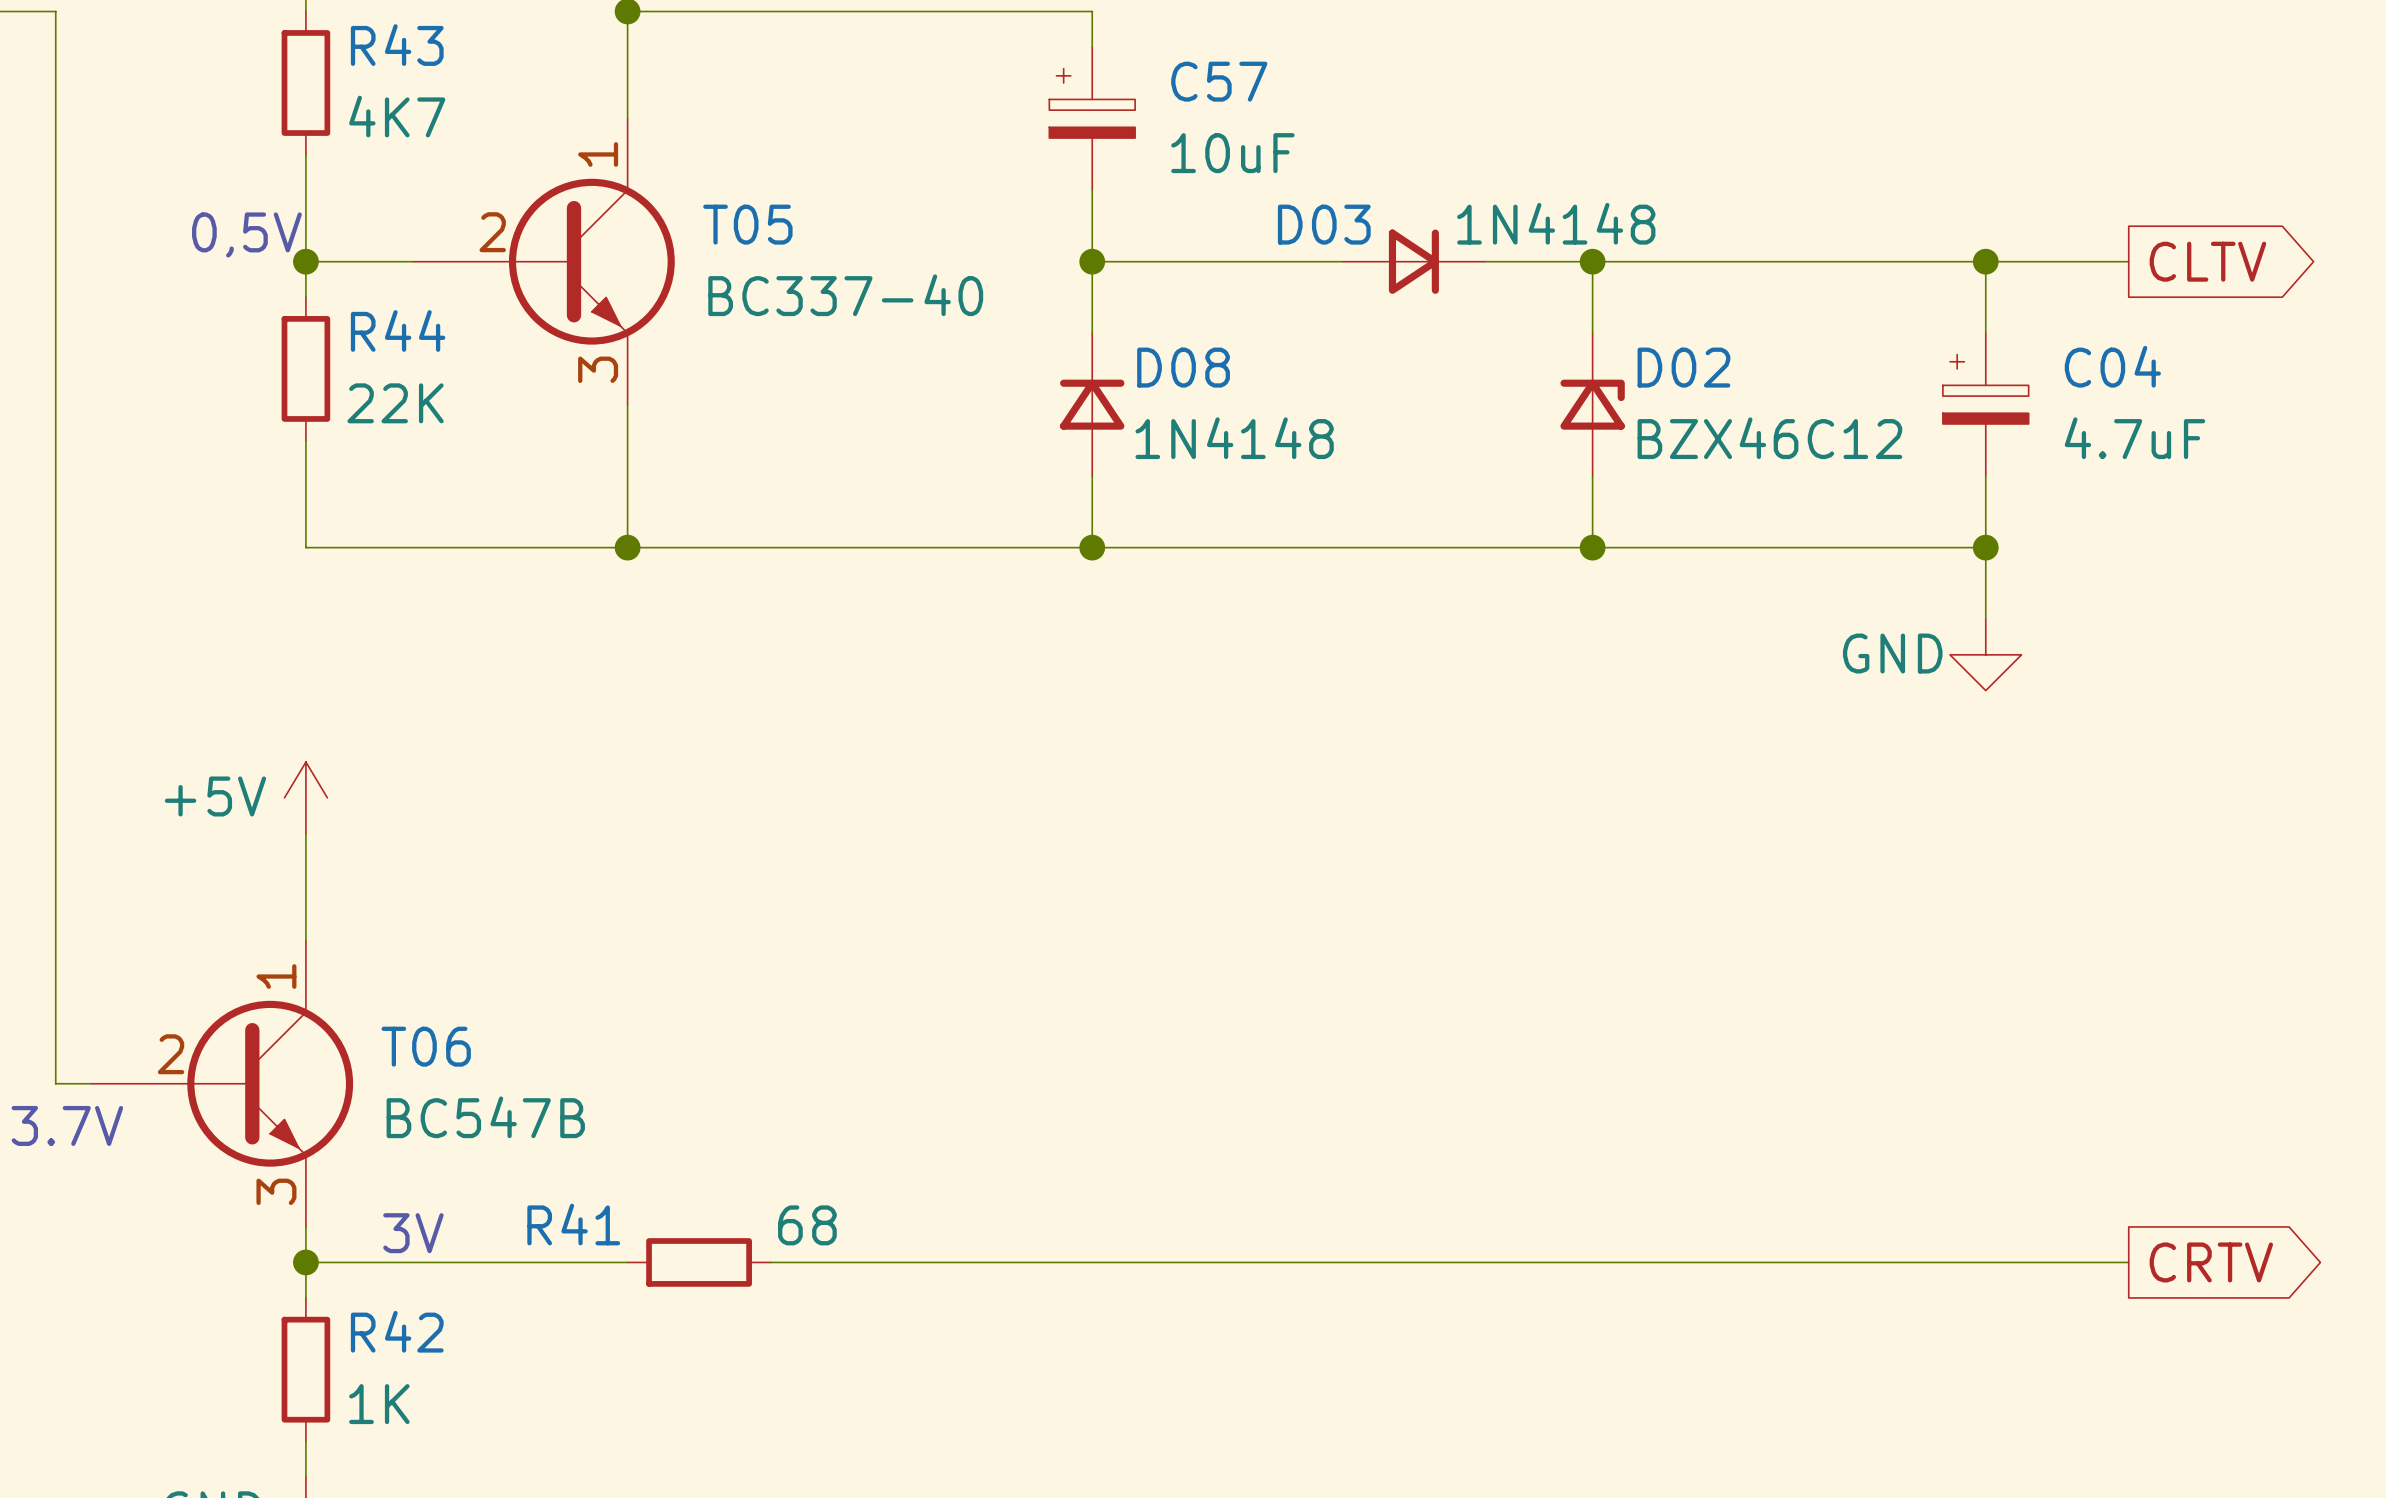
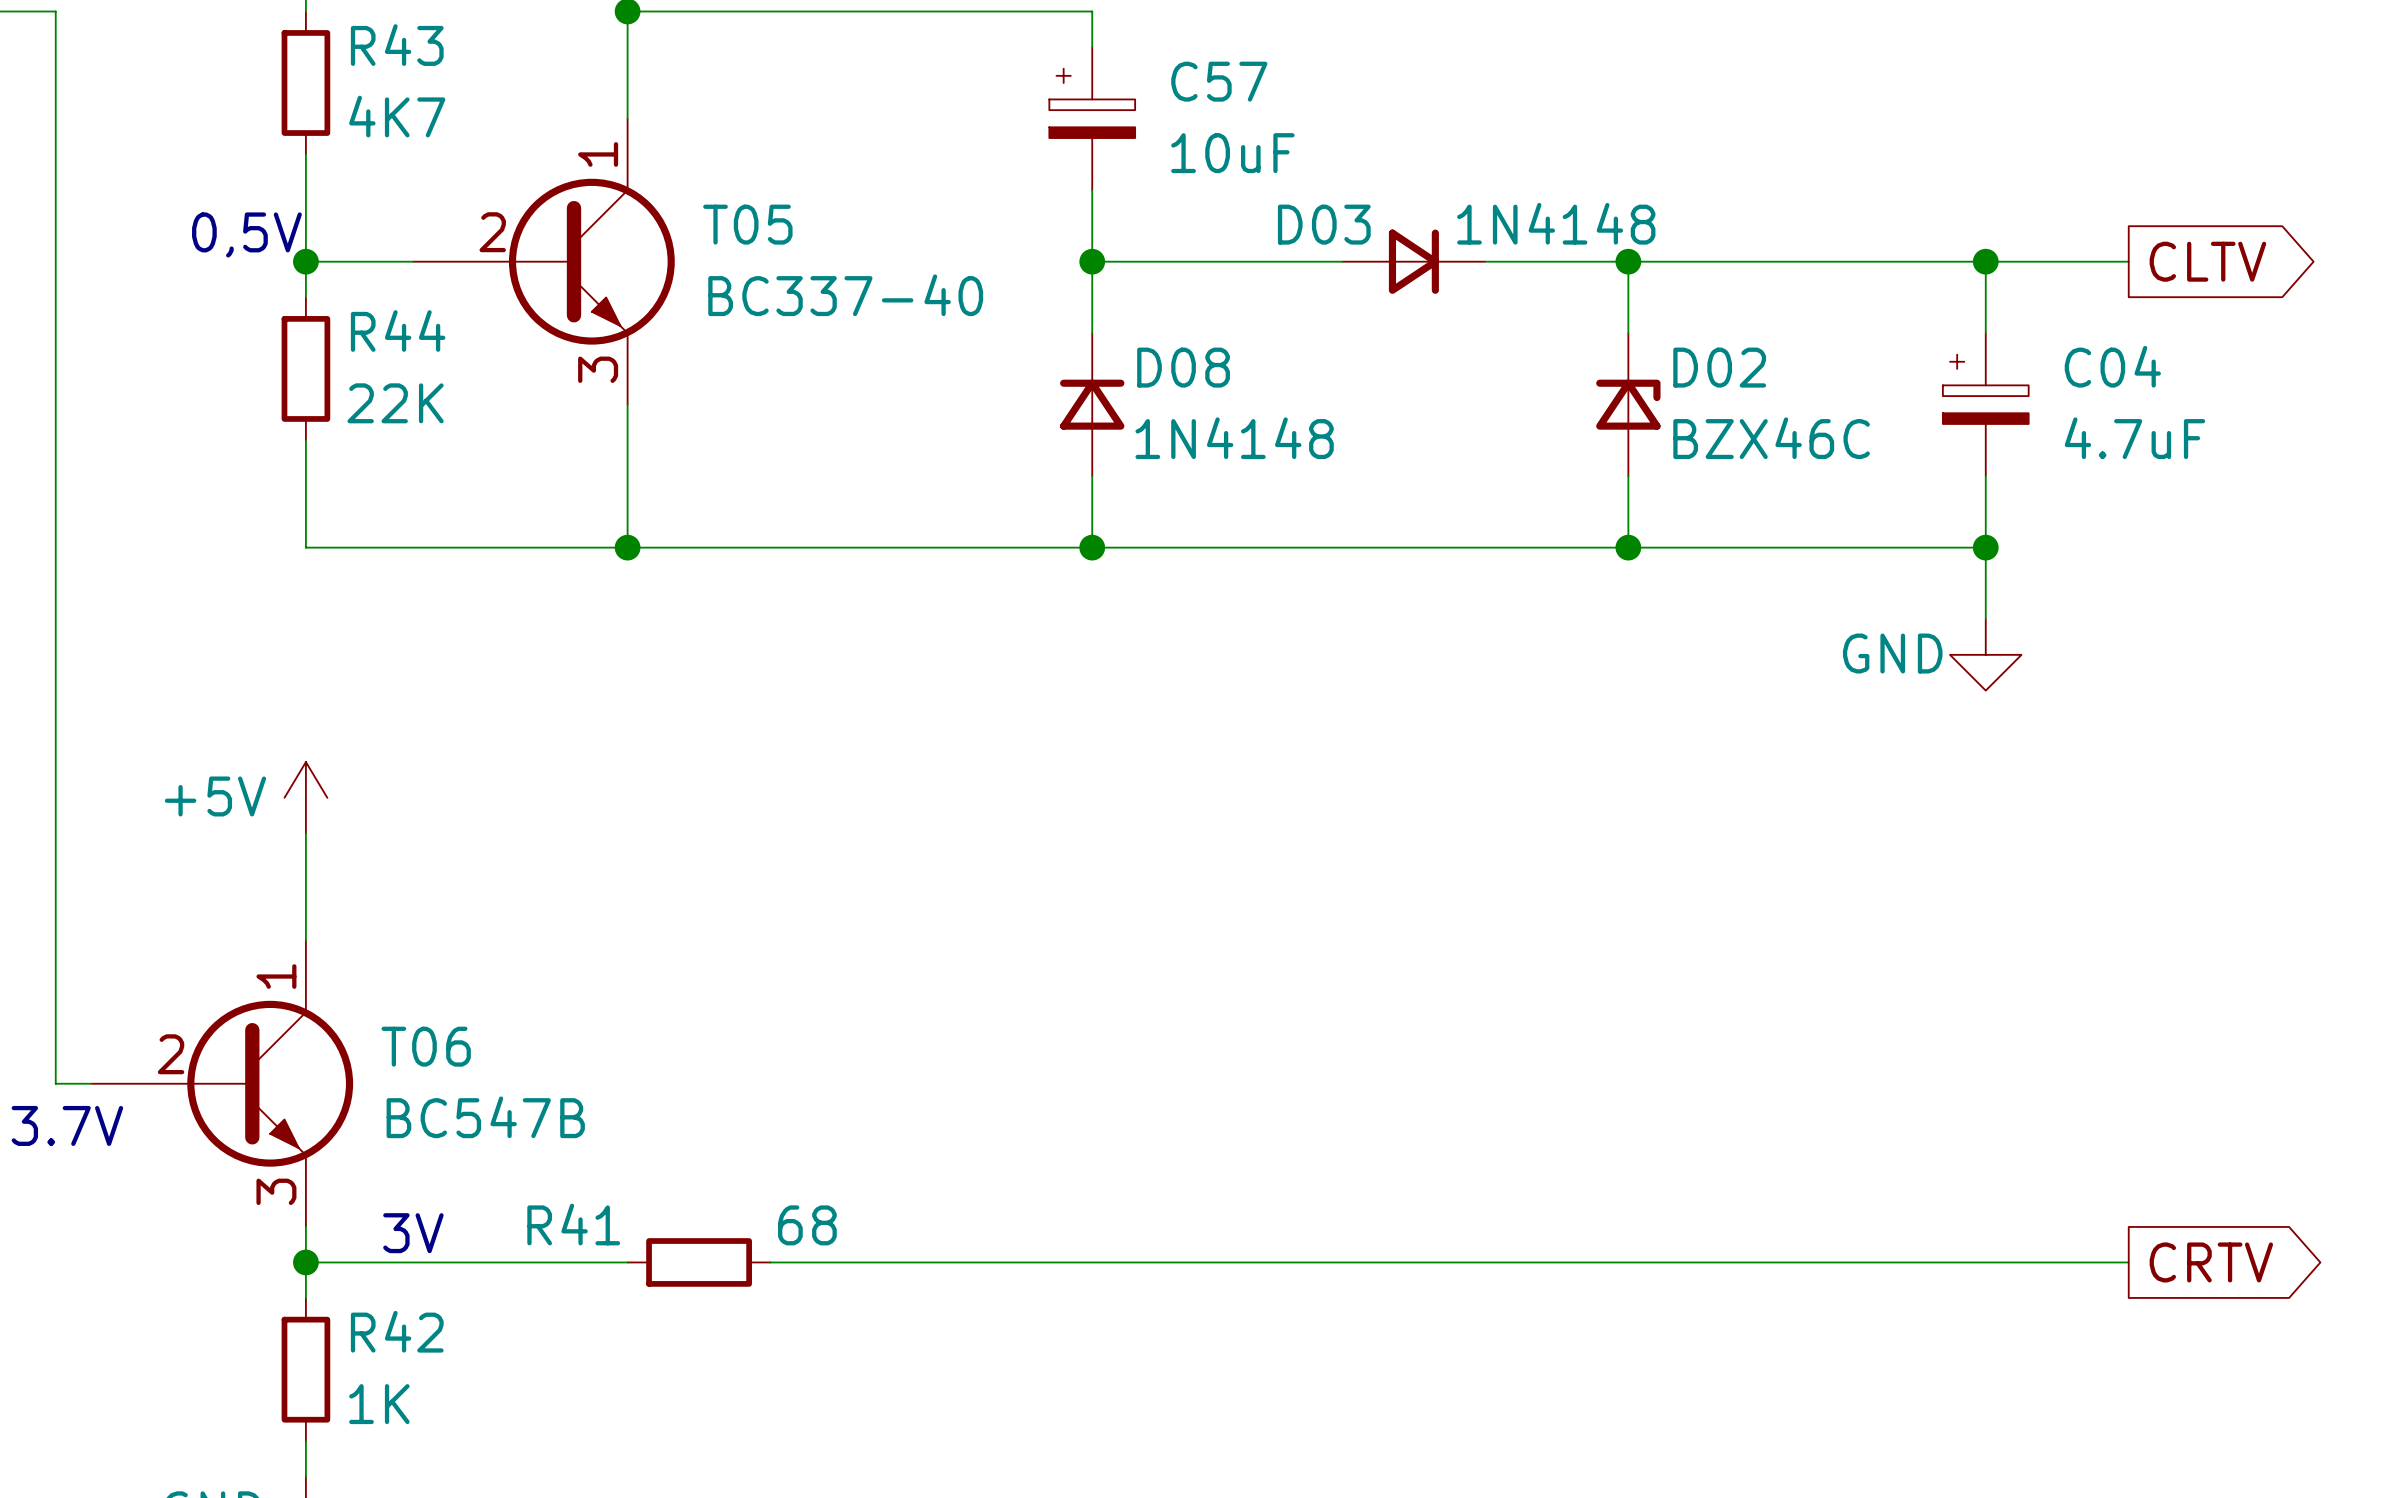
wire: (1592, 261) (1592, 333) -> (1628, 261) (1628, 333)
junction position: (1592, 261) -> (1628, 261)
D02 position: (1592, 404) -> (1628, 404)
D02 value: BZX46C12 (1769, 438) -> BZX46C (1771, 438)
wire: (1592, 476) (1592, 547) -> (1628, 476) (1628, 547)
junction position: (1592, 547) -> (1628, 547)

